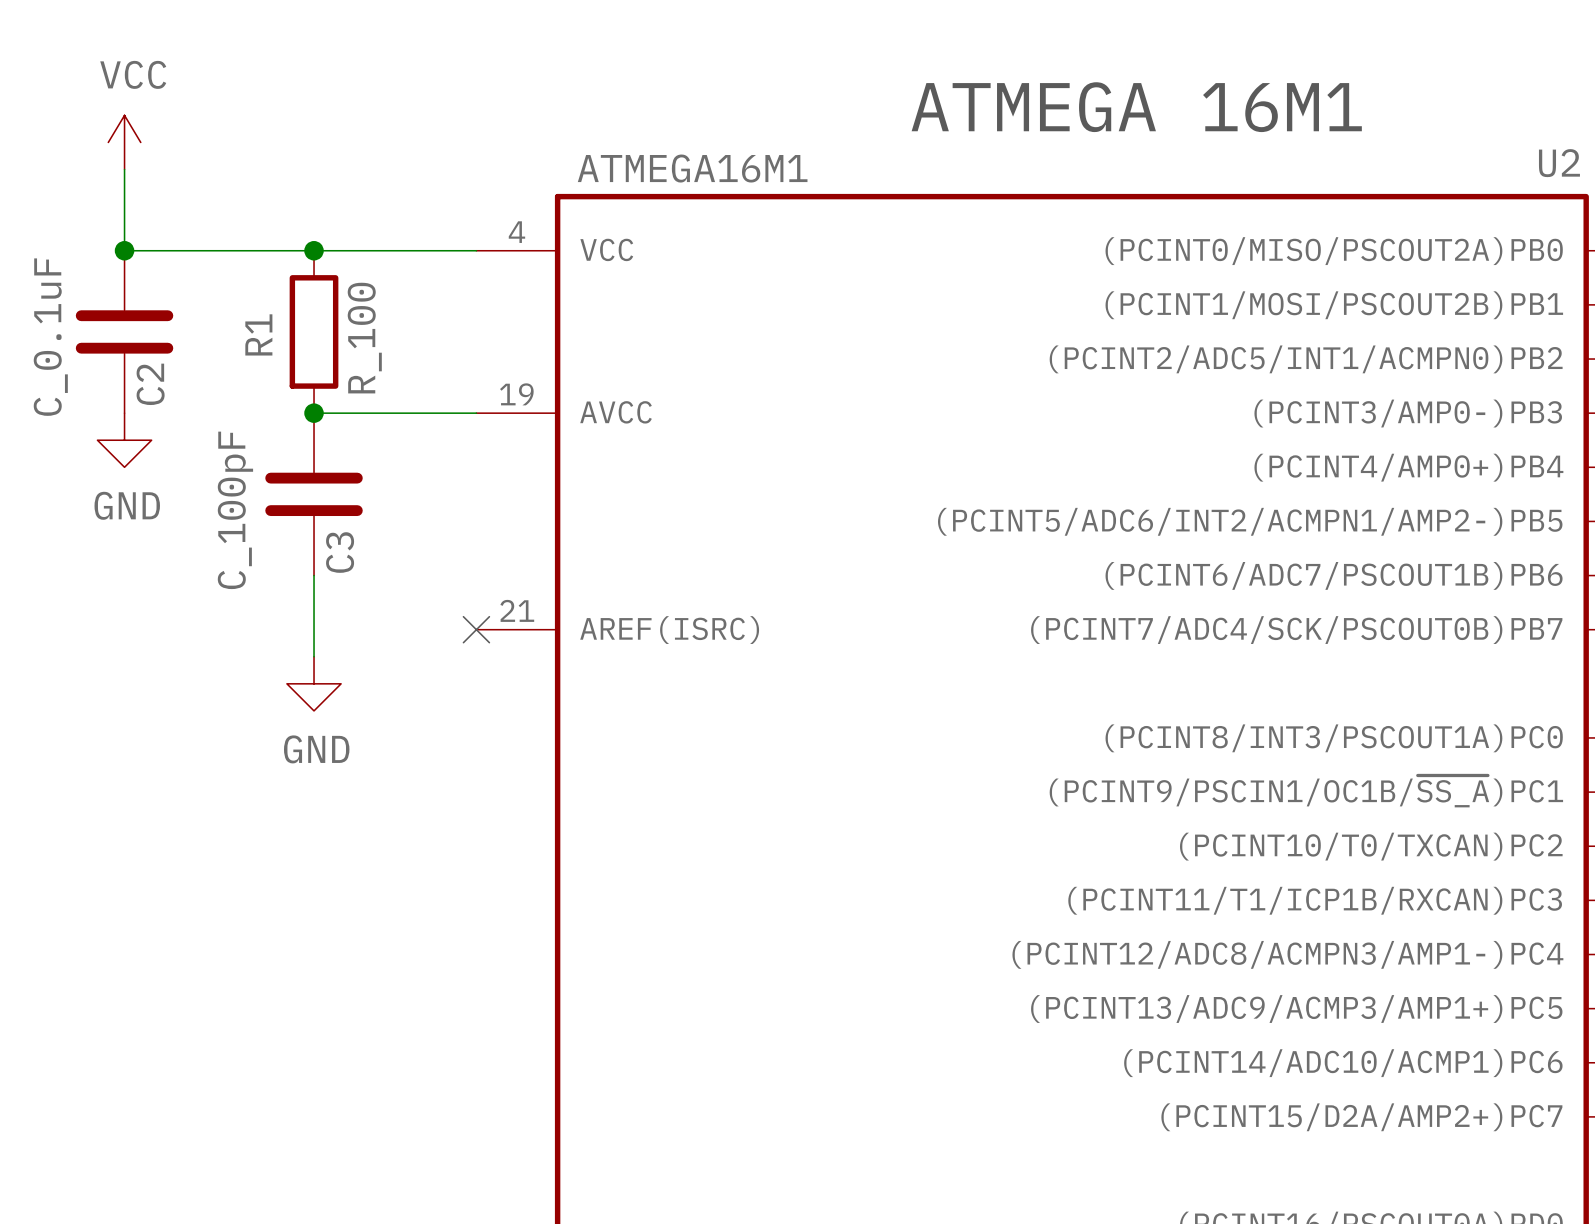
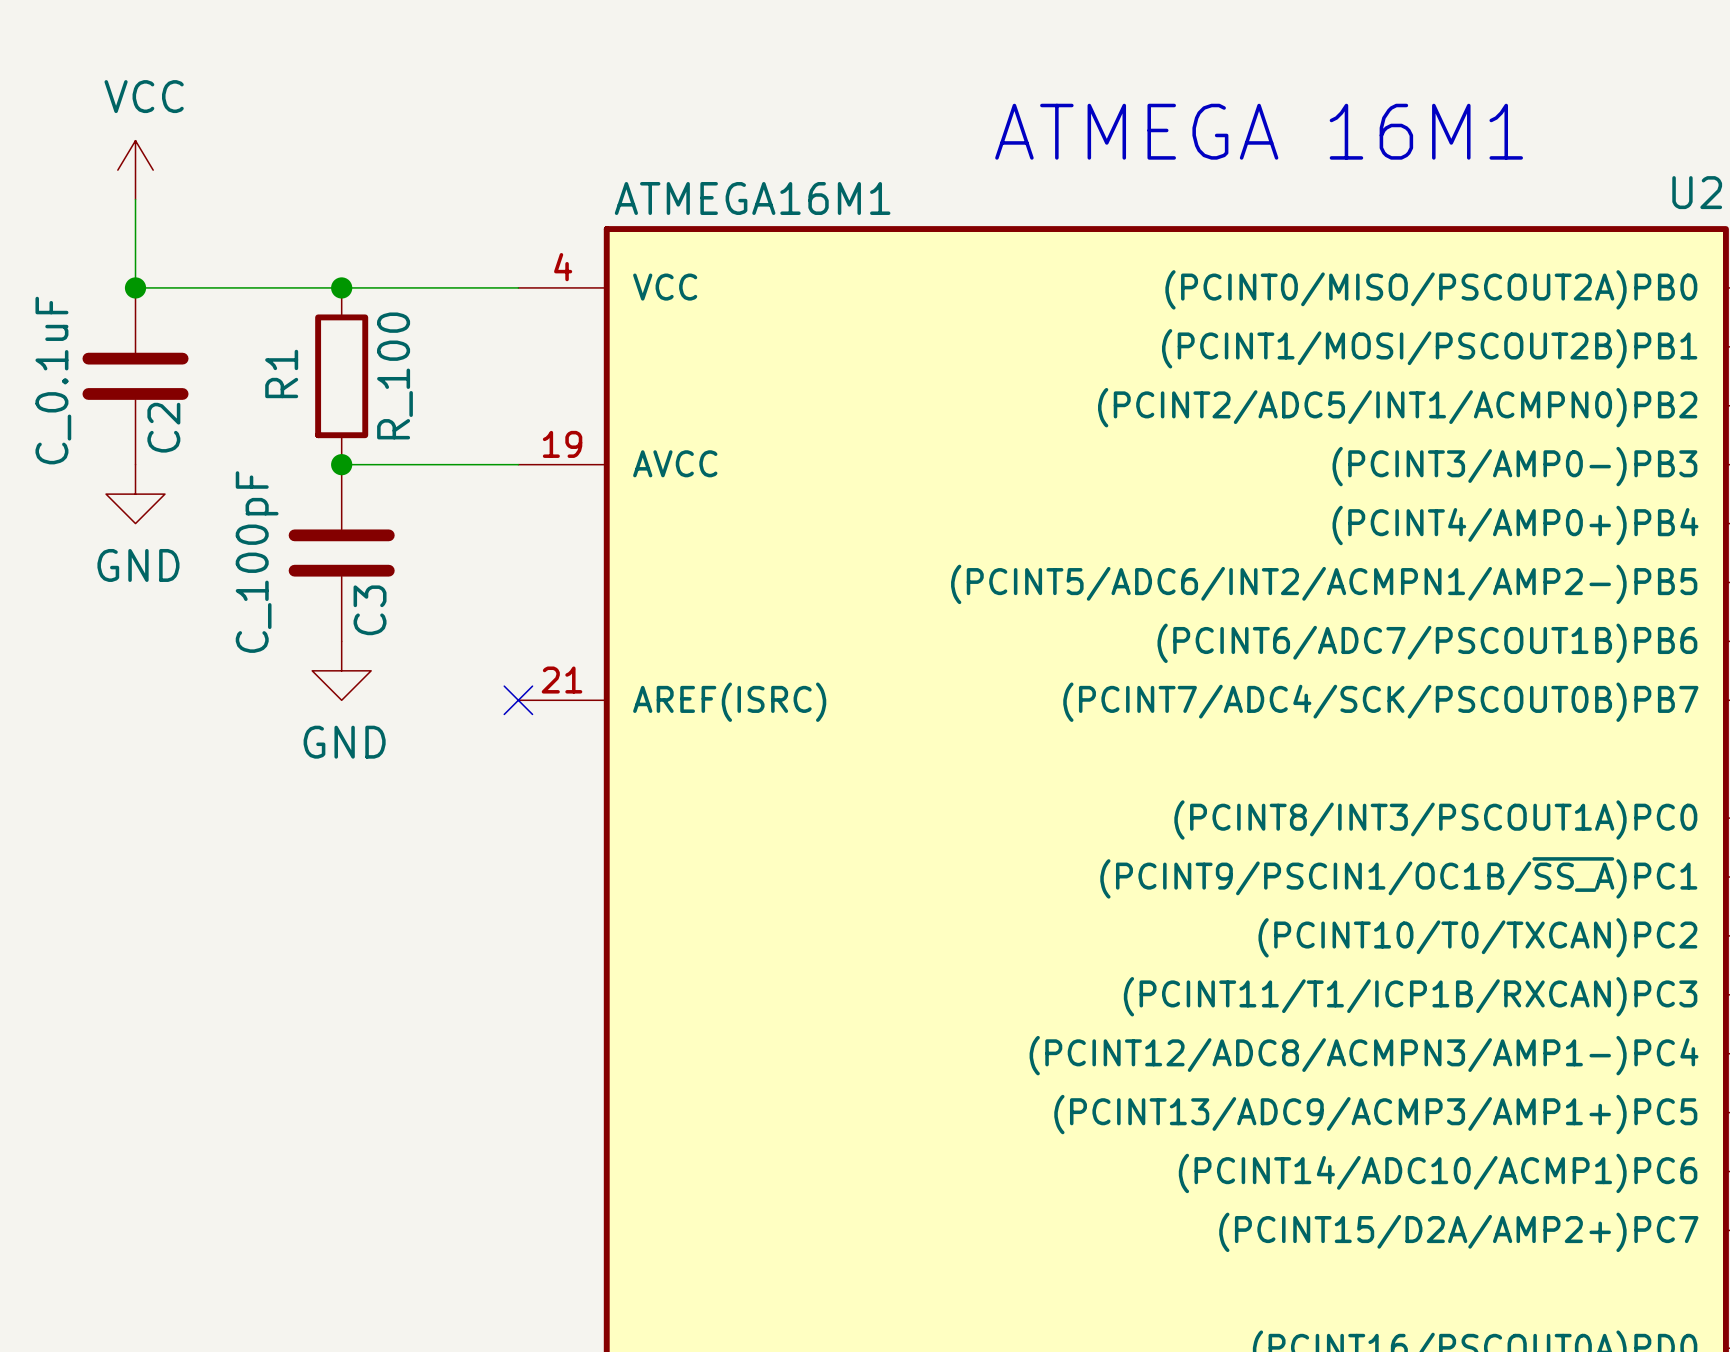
wire: (314, 575) (314, 656) -> none
power symbol position: GND (314, 683) -> GND (341, 670)

